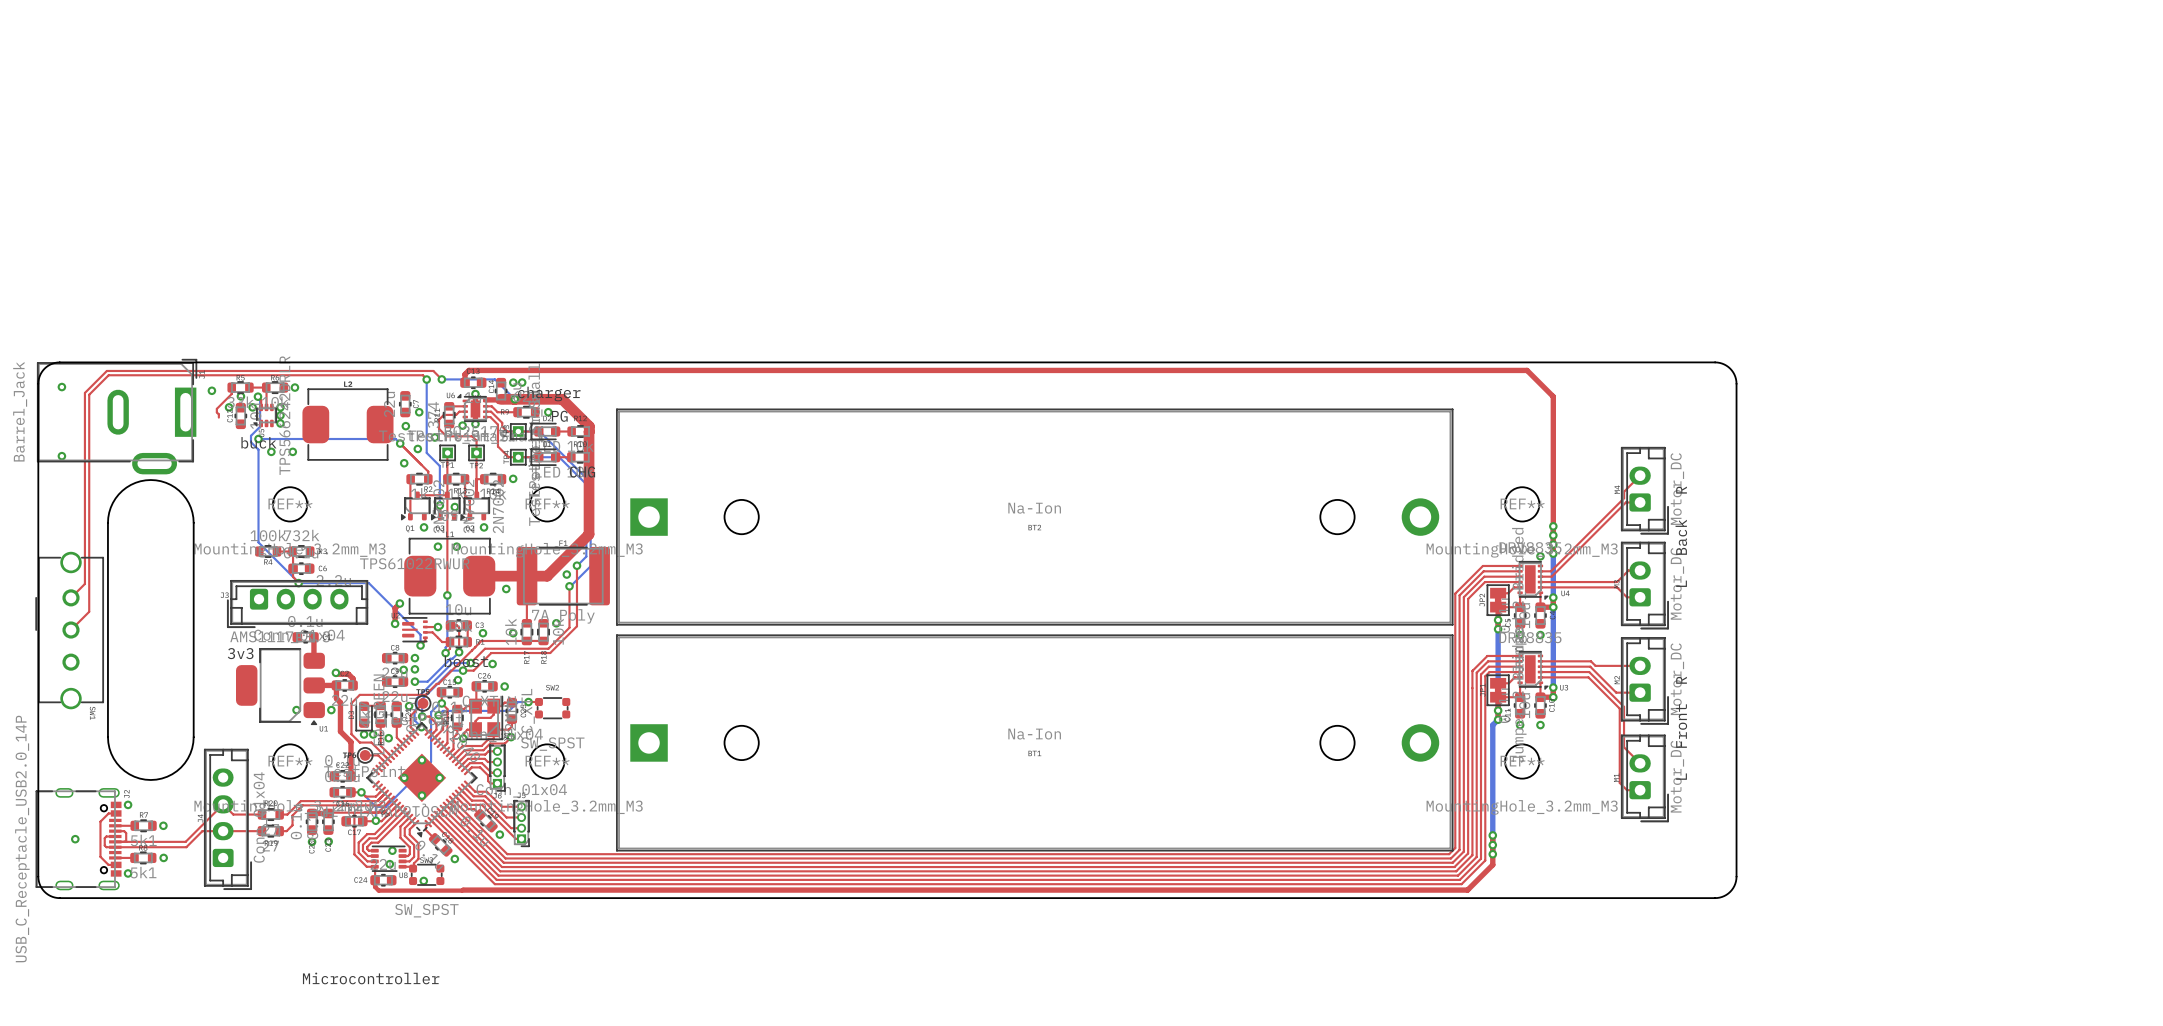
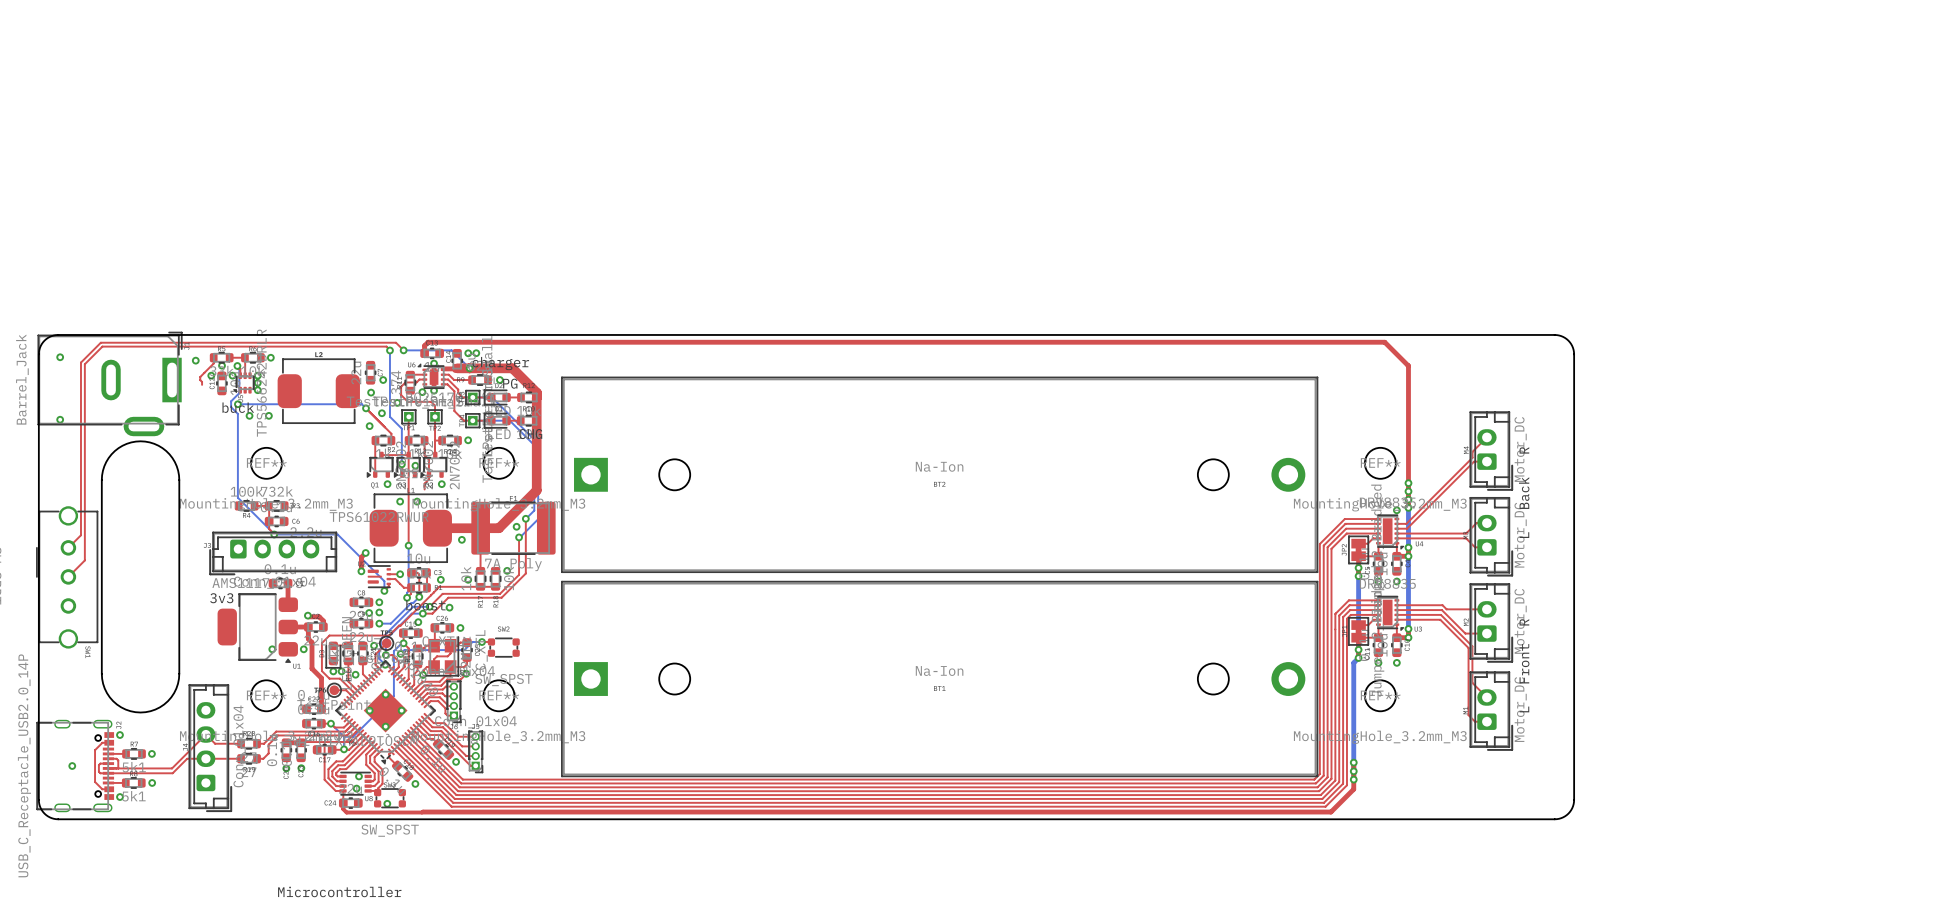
top track: none -> (428, 474) (428, 479) (424, 483) (424, 489)

